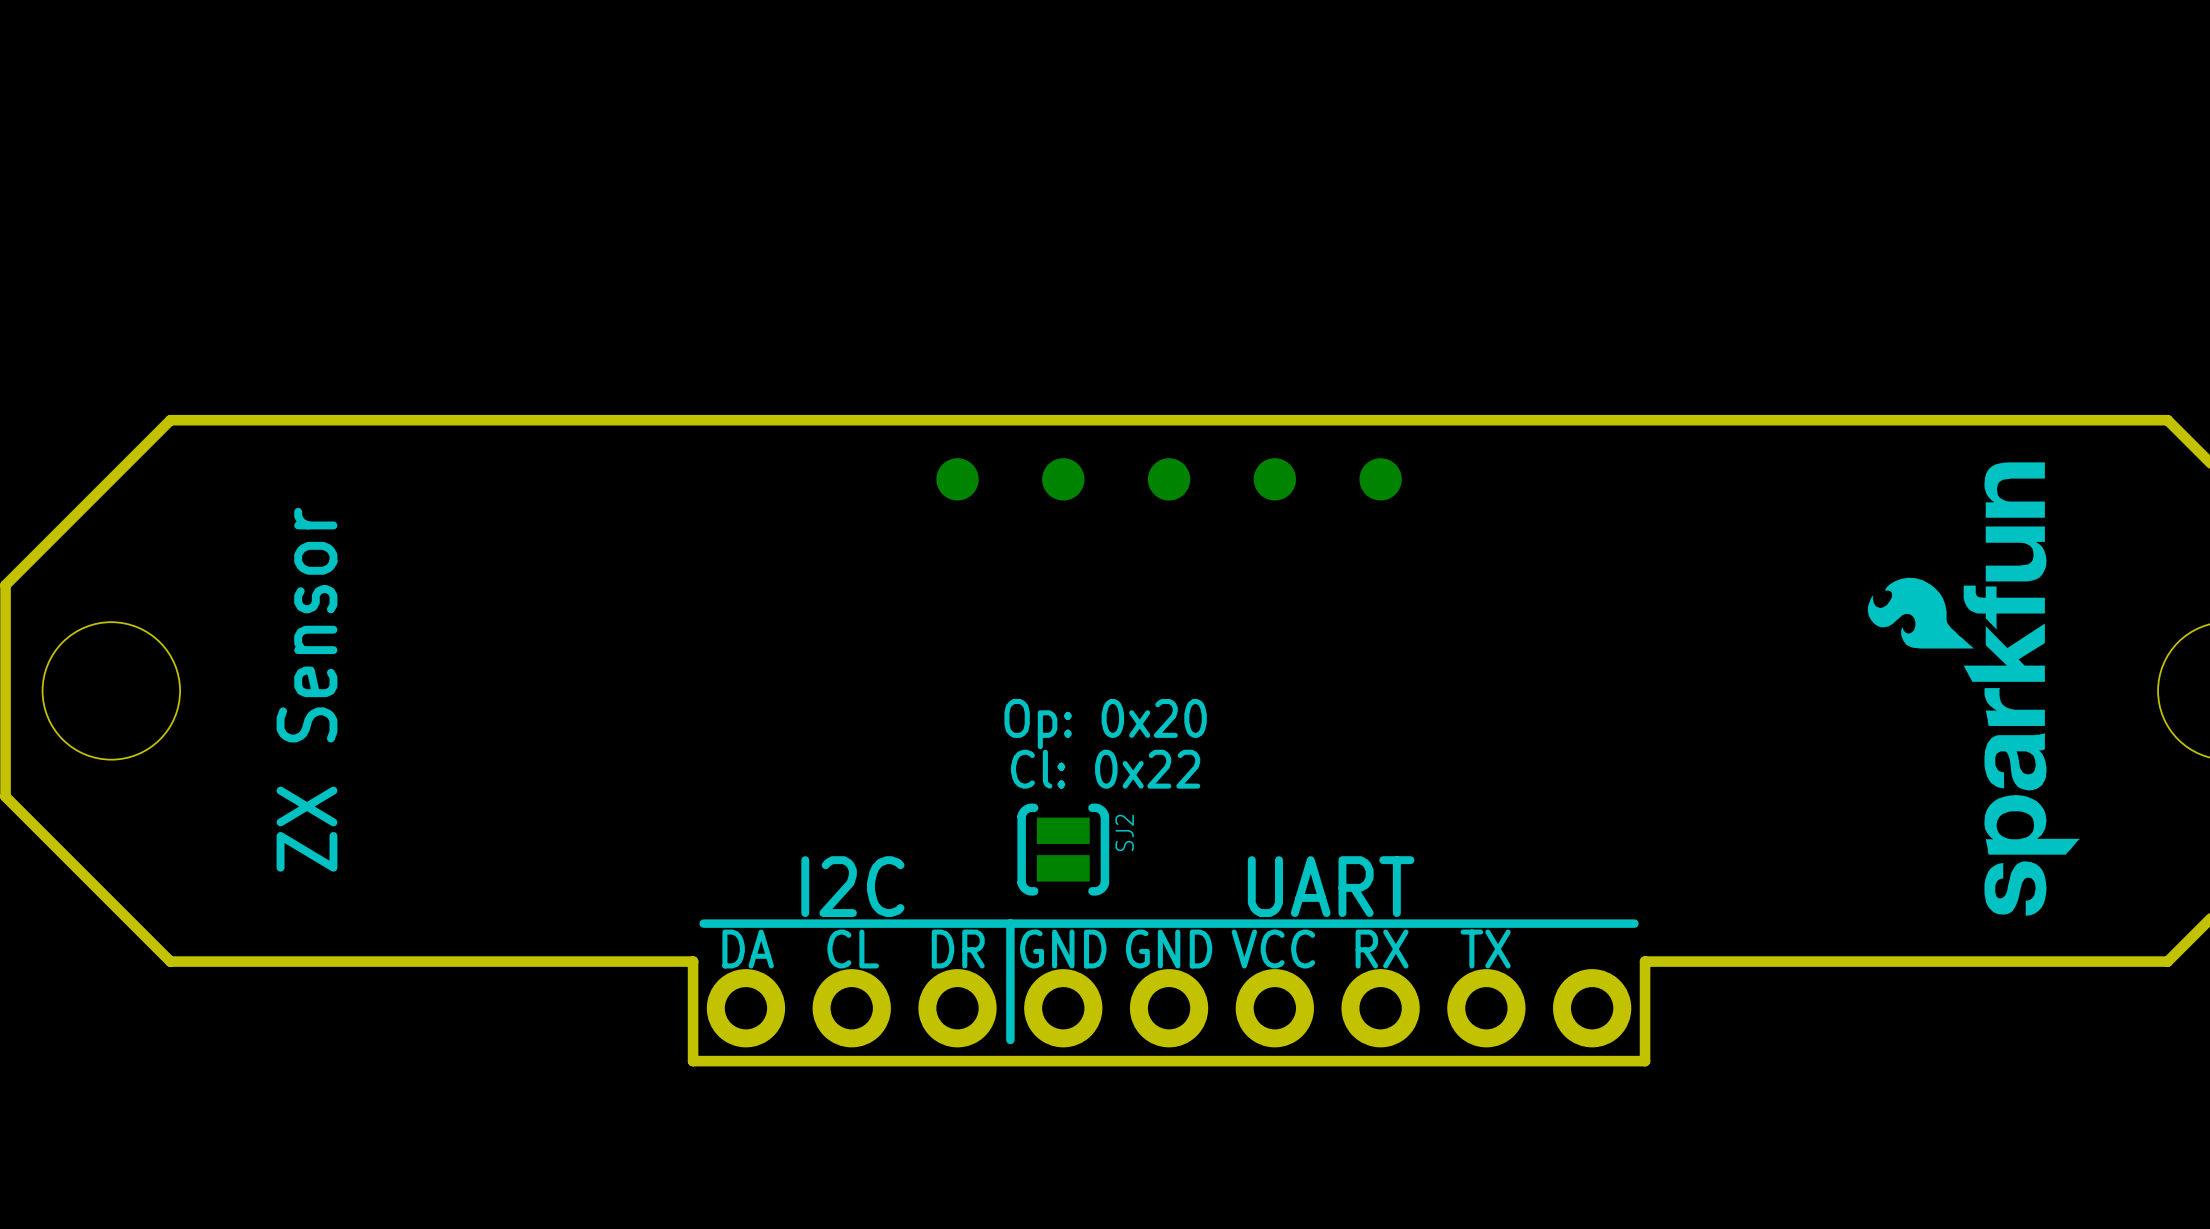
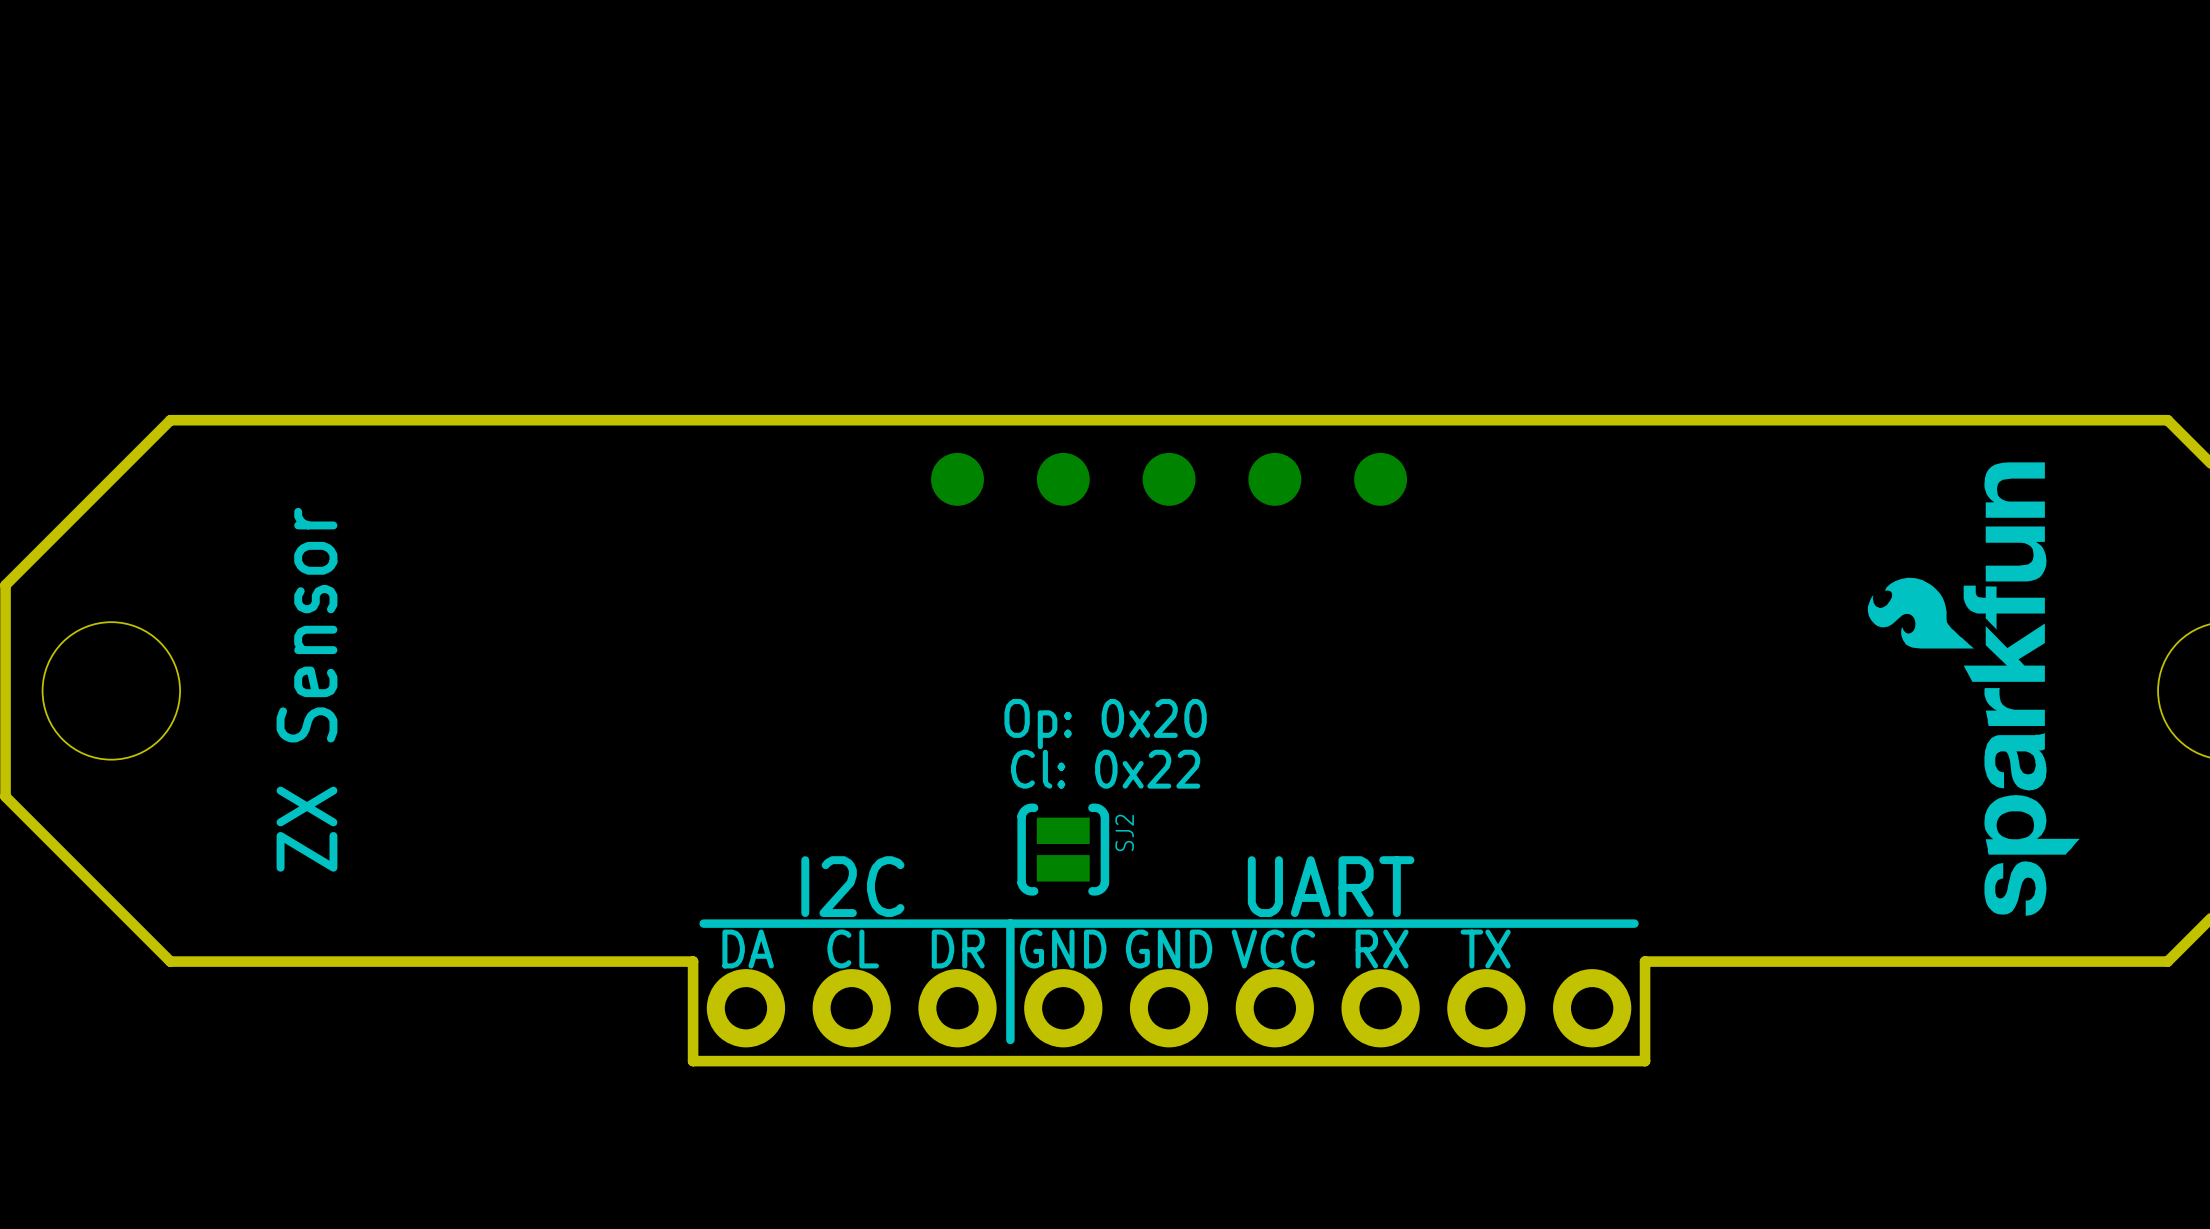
part footprint: [936, 458, 979, 501] -> [931, 452, 984, 506]
part footprint: [1042, 458, 1085, 501] -> [1036, 452, 1090, 506]
part footprint: [1147, 458, 1191, 501] -> [1142, 452, 1196, 506]
part footprint: [1253, 458, 1296, 501] -> [1248, 452, 1302, 506]
part footprint: [1359, 458, 1402, 501] -> [1354, 452, 1408, 506]

